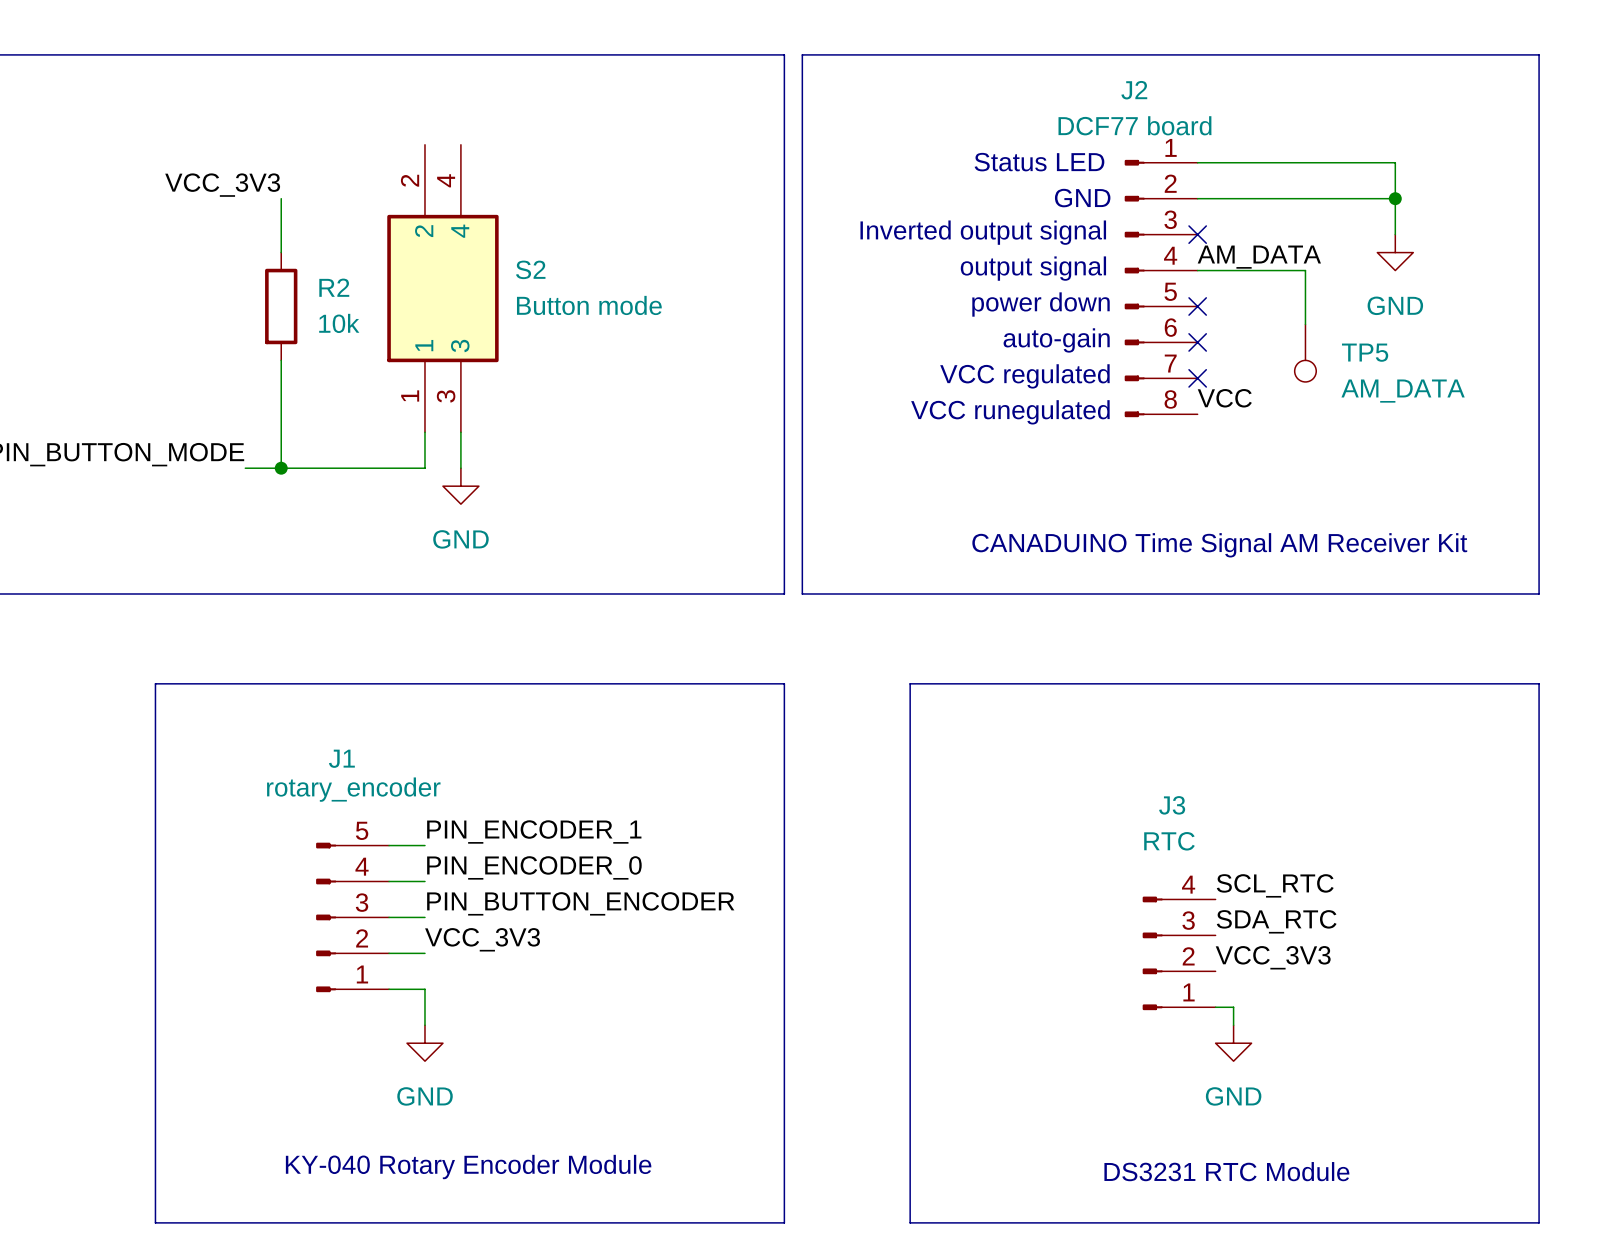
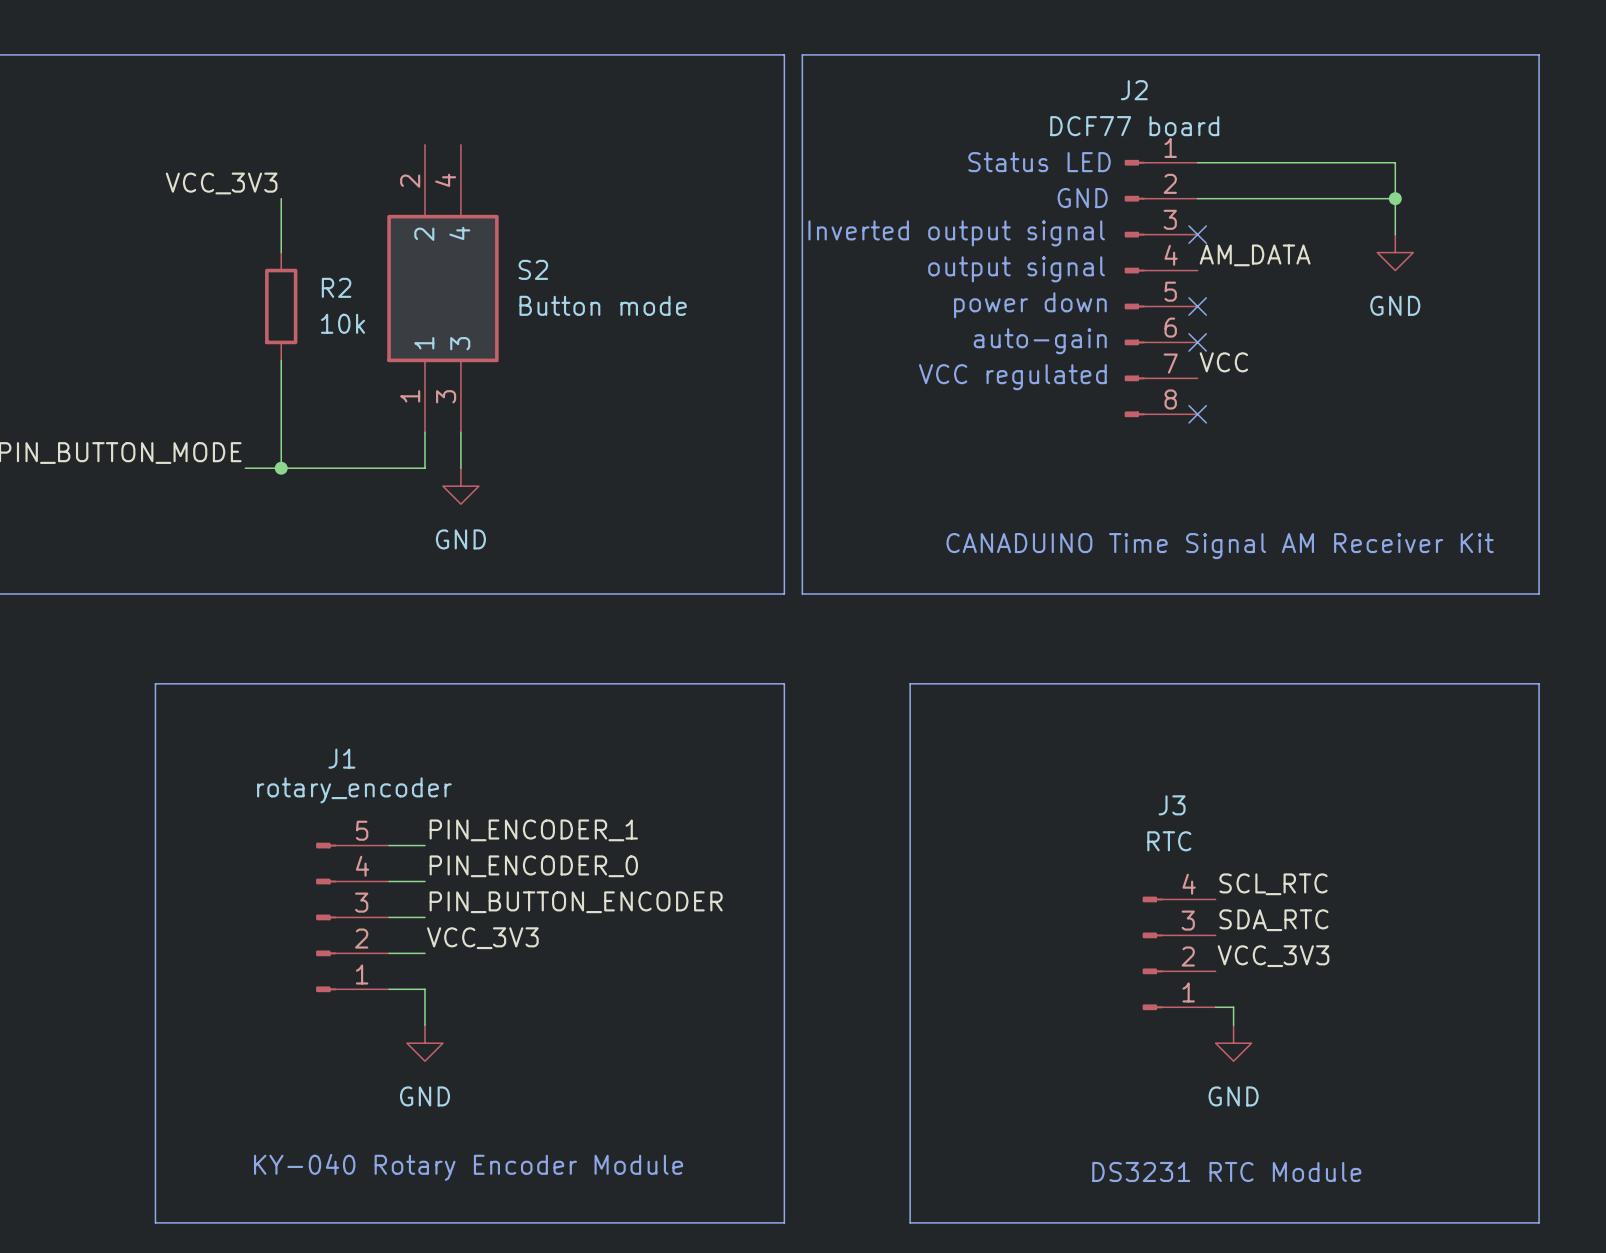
wire: (1197, 270) (1305, 270) (1305, 324) -> none
TP5: AM_DATA (1305, 353) -> none
no-connect mark position: (1197, 378) -> (1197, 414)
label position: VCC (1224, 398) -> VCC (1223, 362)
text: VCC runegulated (1010, 412) -> none

